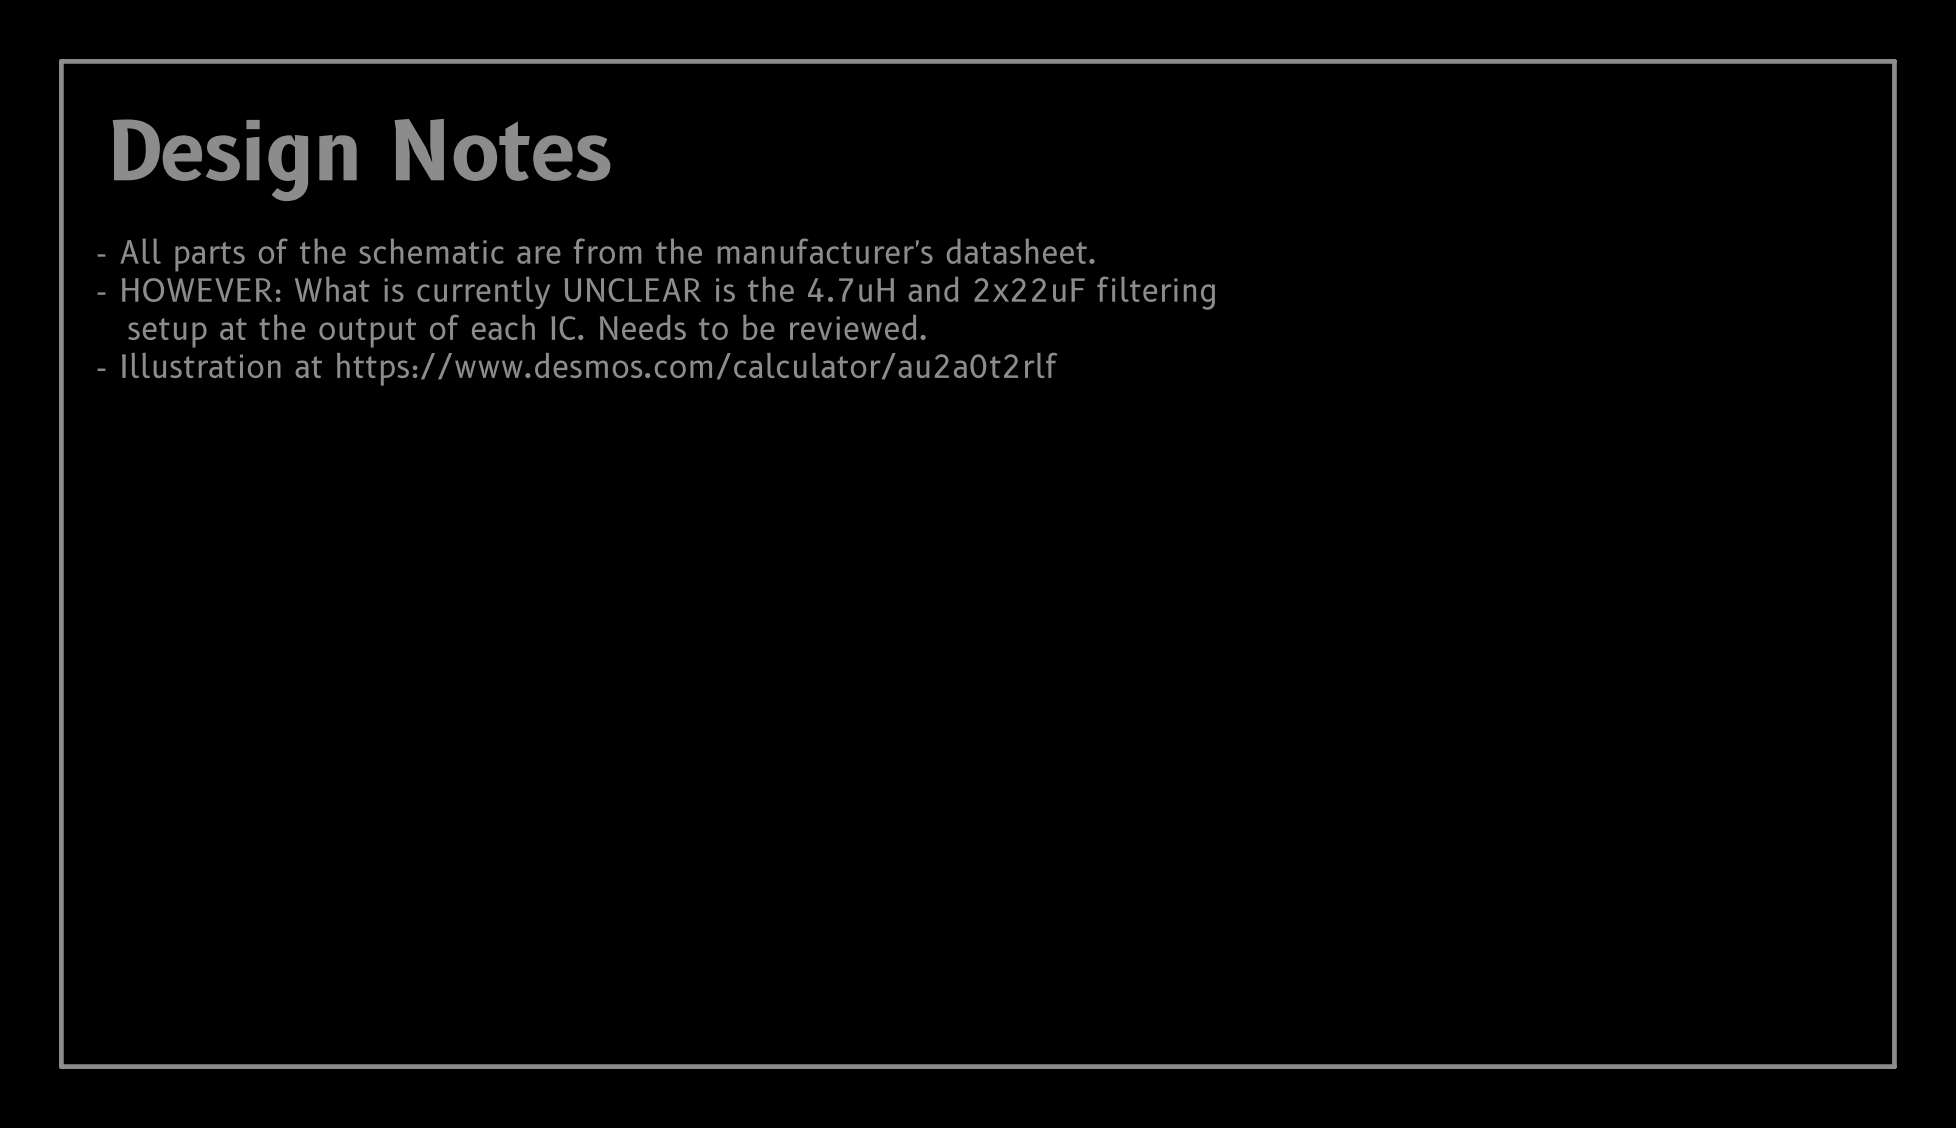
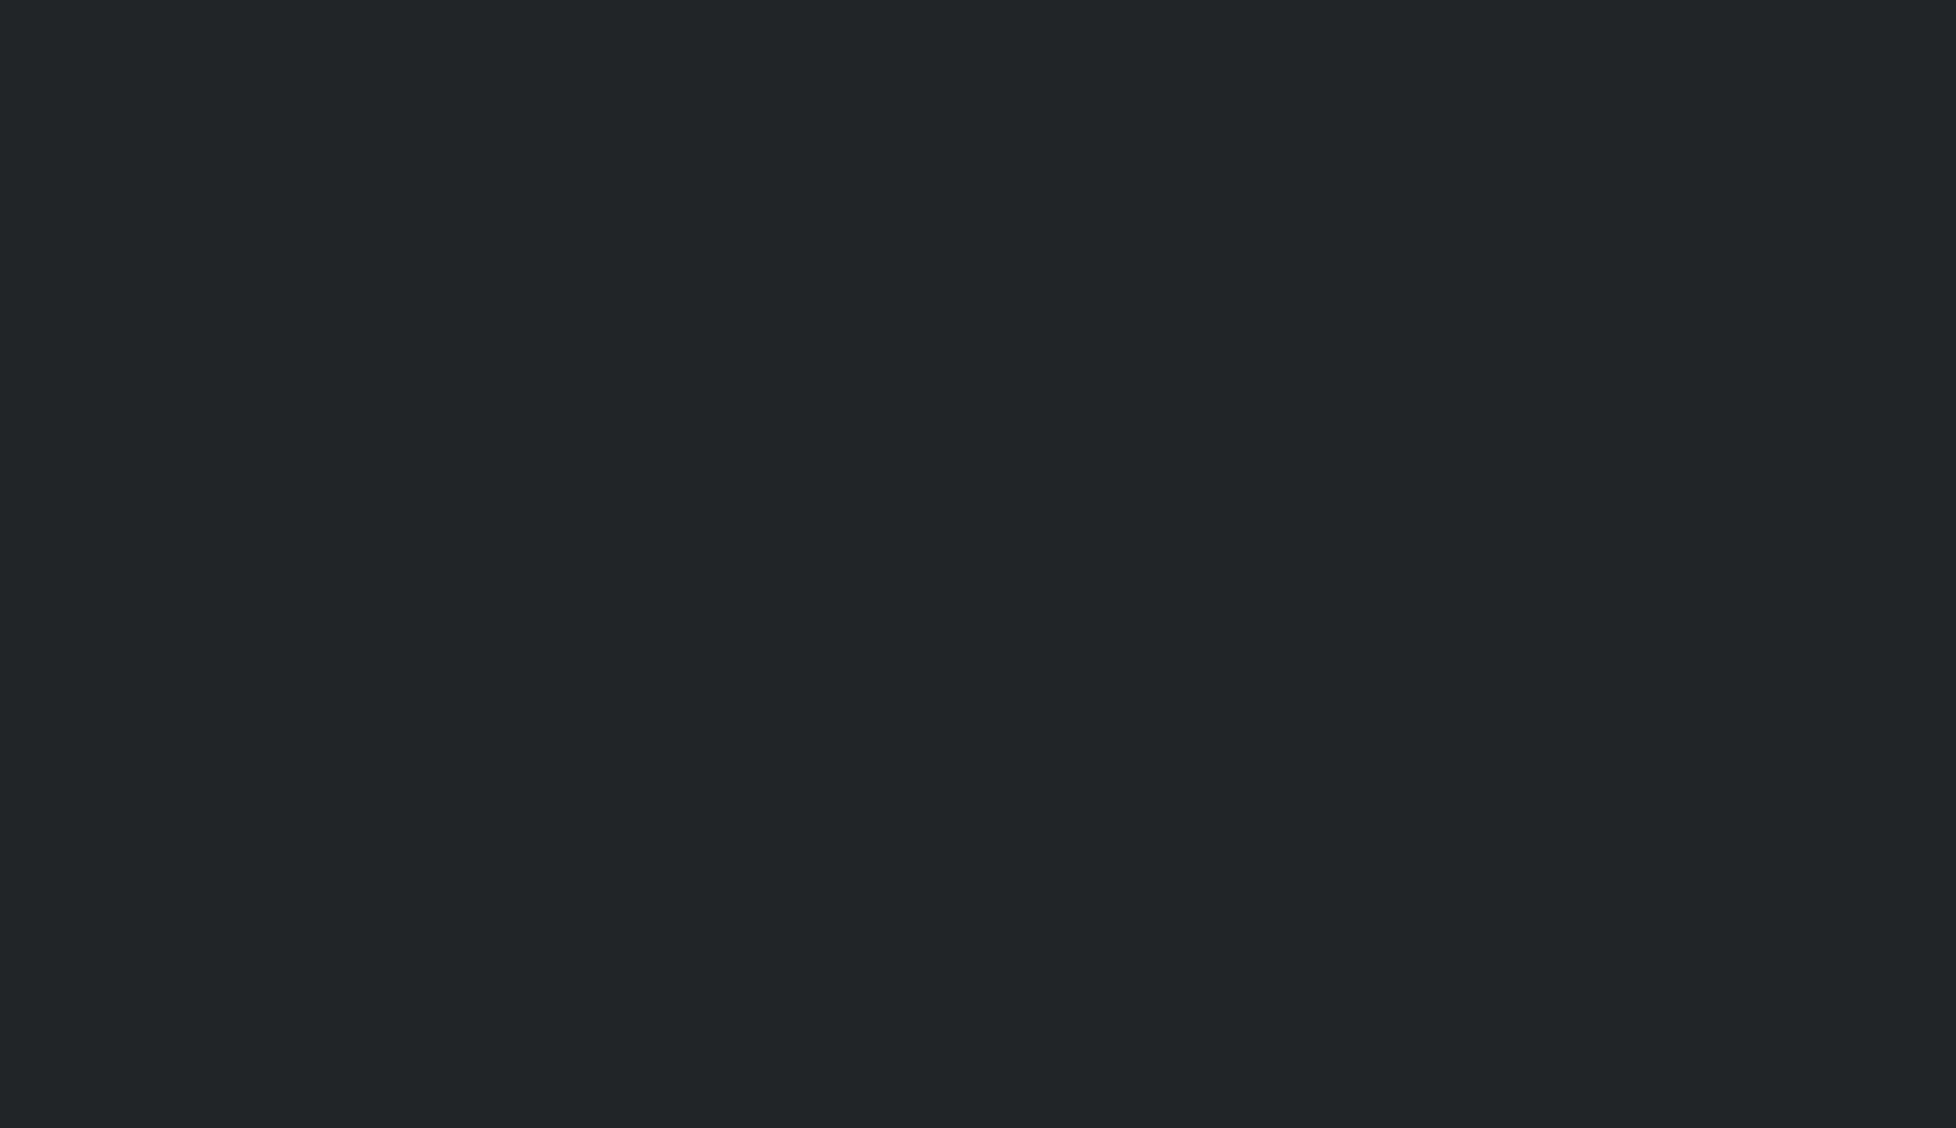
line: (61, 61) (1894, 61) (1894, 1066) (61, 1066) (61, 61) -> none
text: Design Notes (361, 159) -> none
text: - All parts of the schematic are from the manufacturer's datasheet. (596, 254) -> none
text: - HOWEVER: What is currently UNCLEAR is the 4.7uH and 2x22uF filtering (656, 293) -> none
text: setup at the output of each IC. Needs to be reviewed. (526, 331) -> none
text: - Illustration at https://www.desmos.com/calculator/au2a0t2rlf (577, 369) -> none

